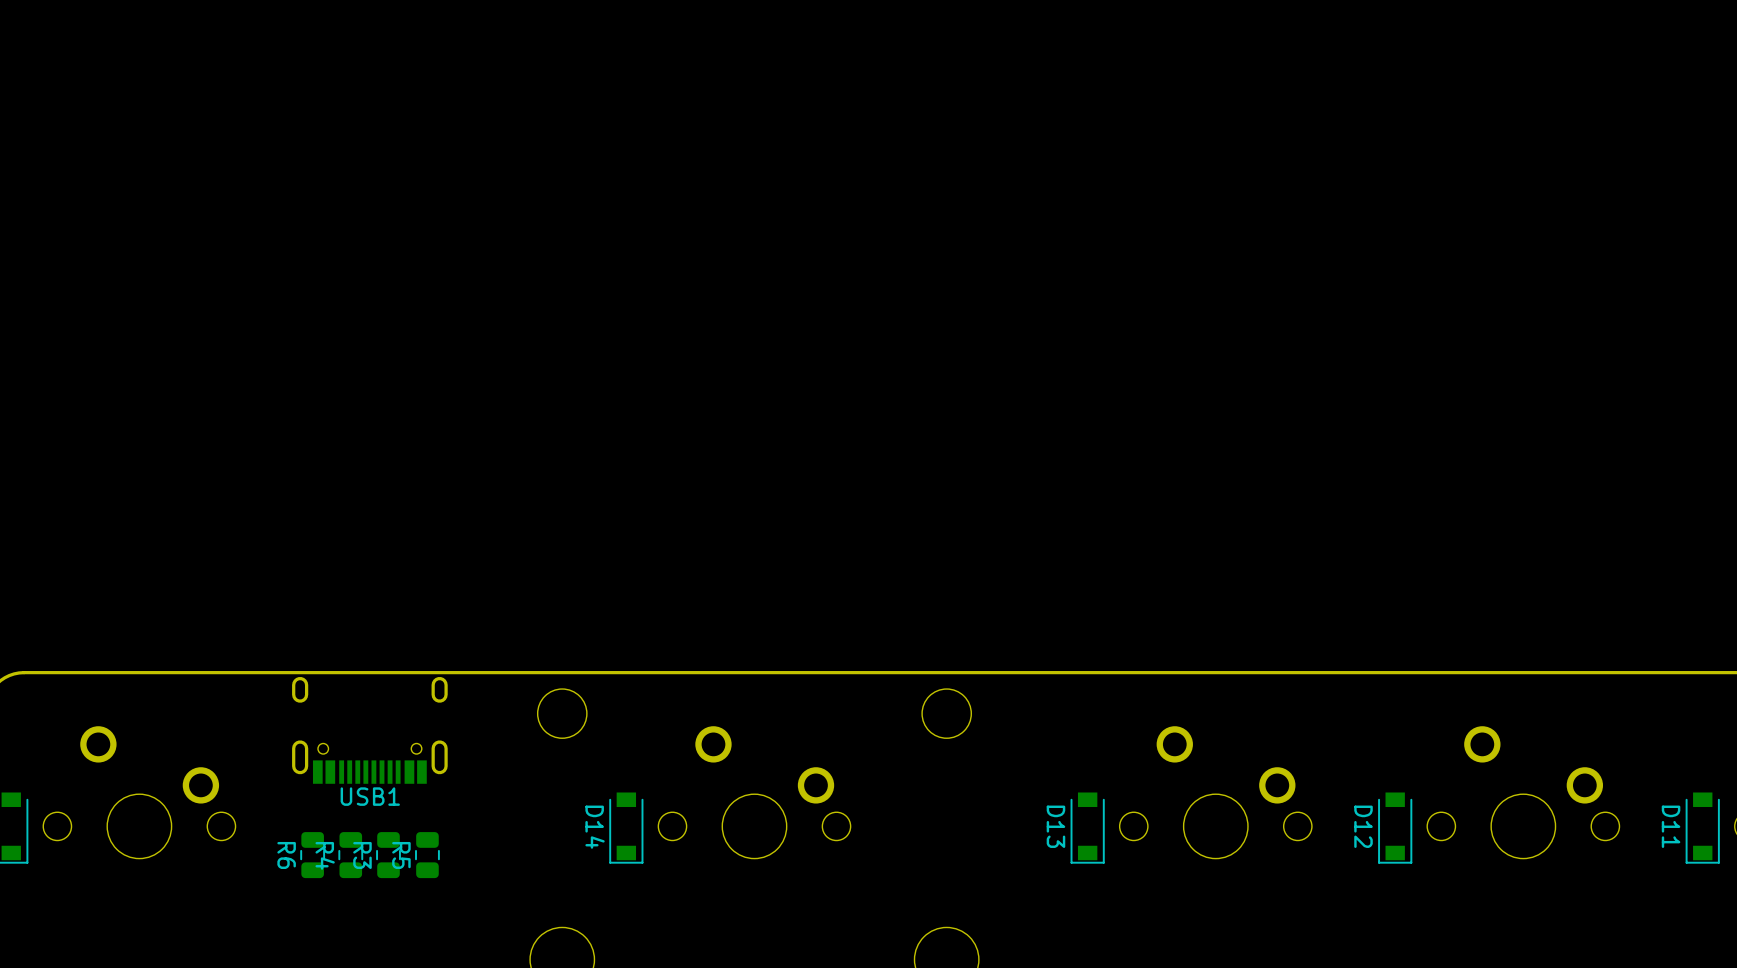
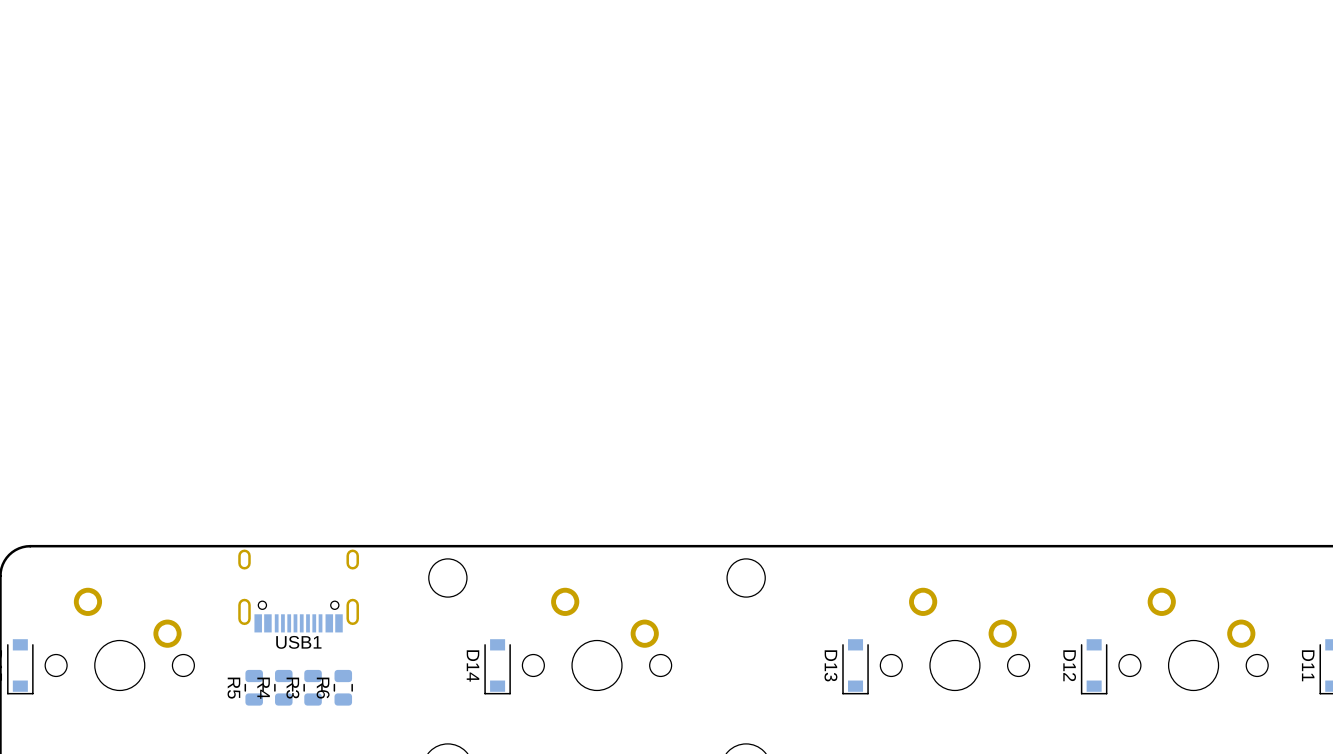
R6 name: R6 (286, 855) -> R5 (233, 688)
R5 name: R5 (401, 855) -> R6 (323, 688)

